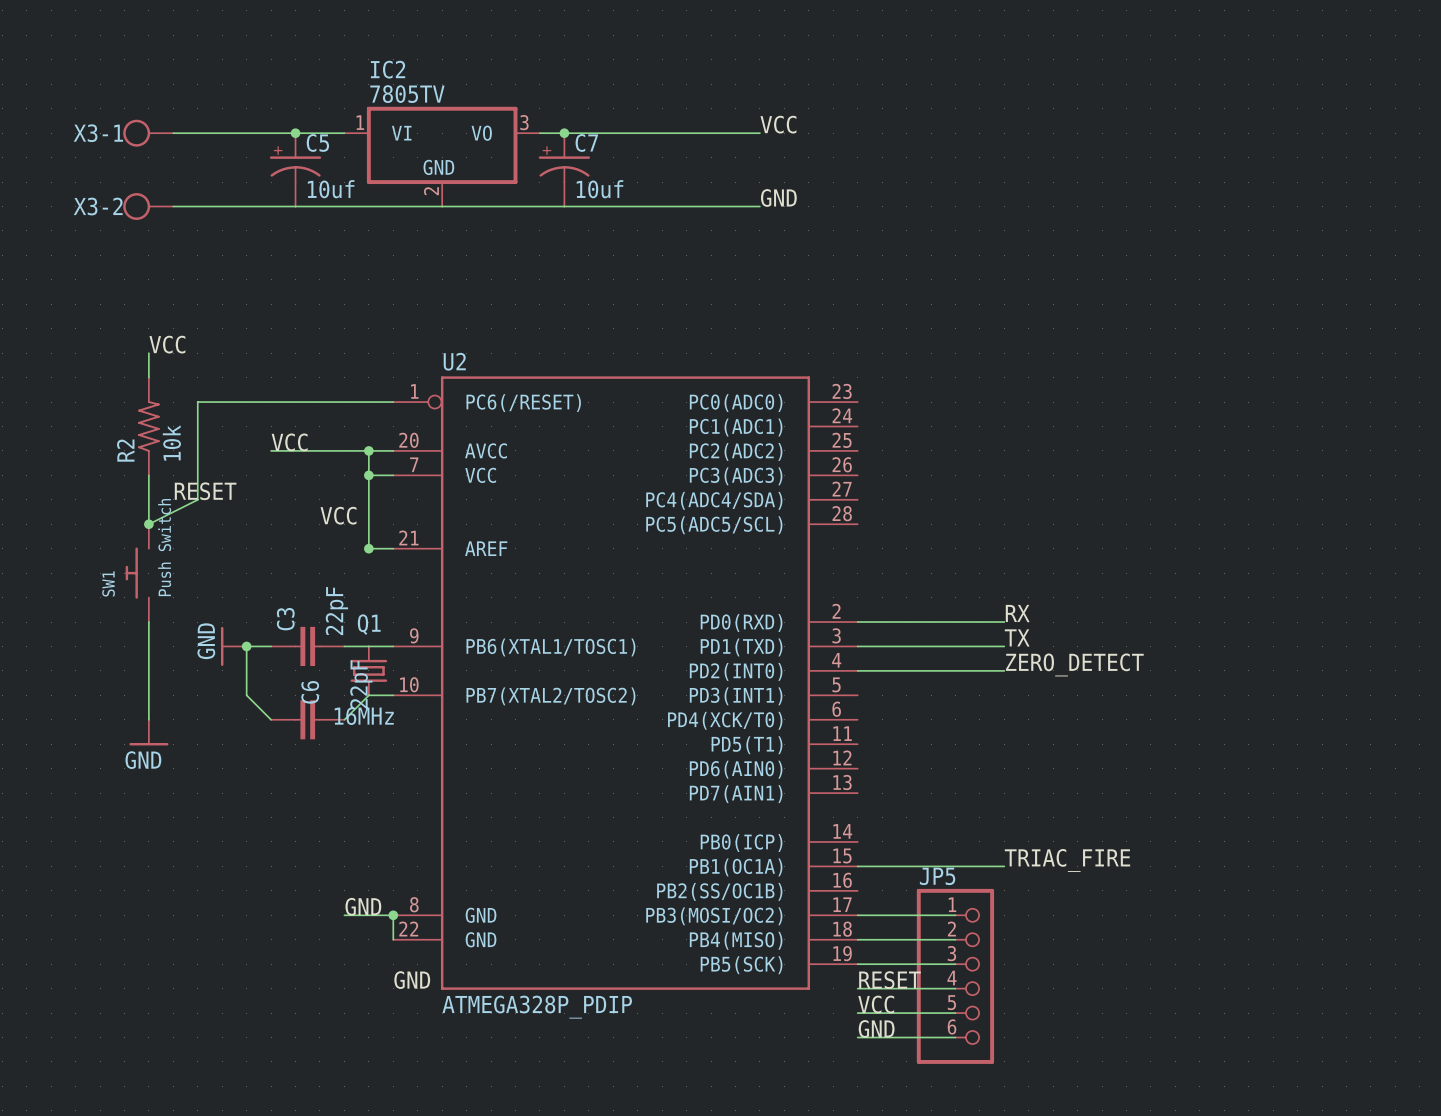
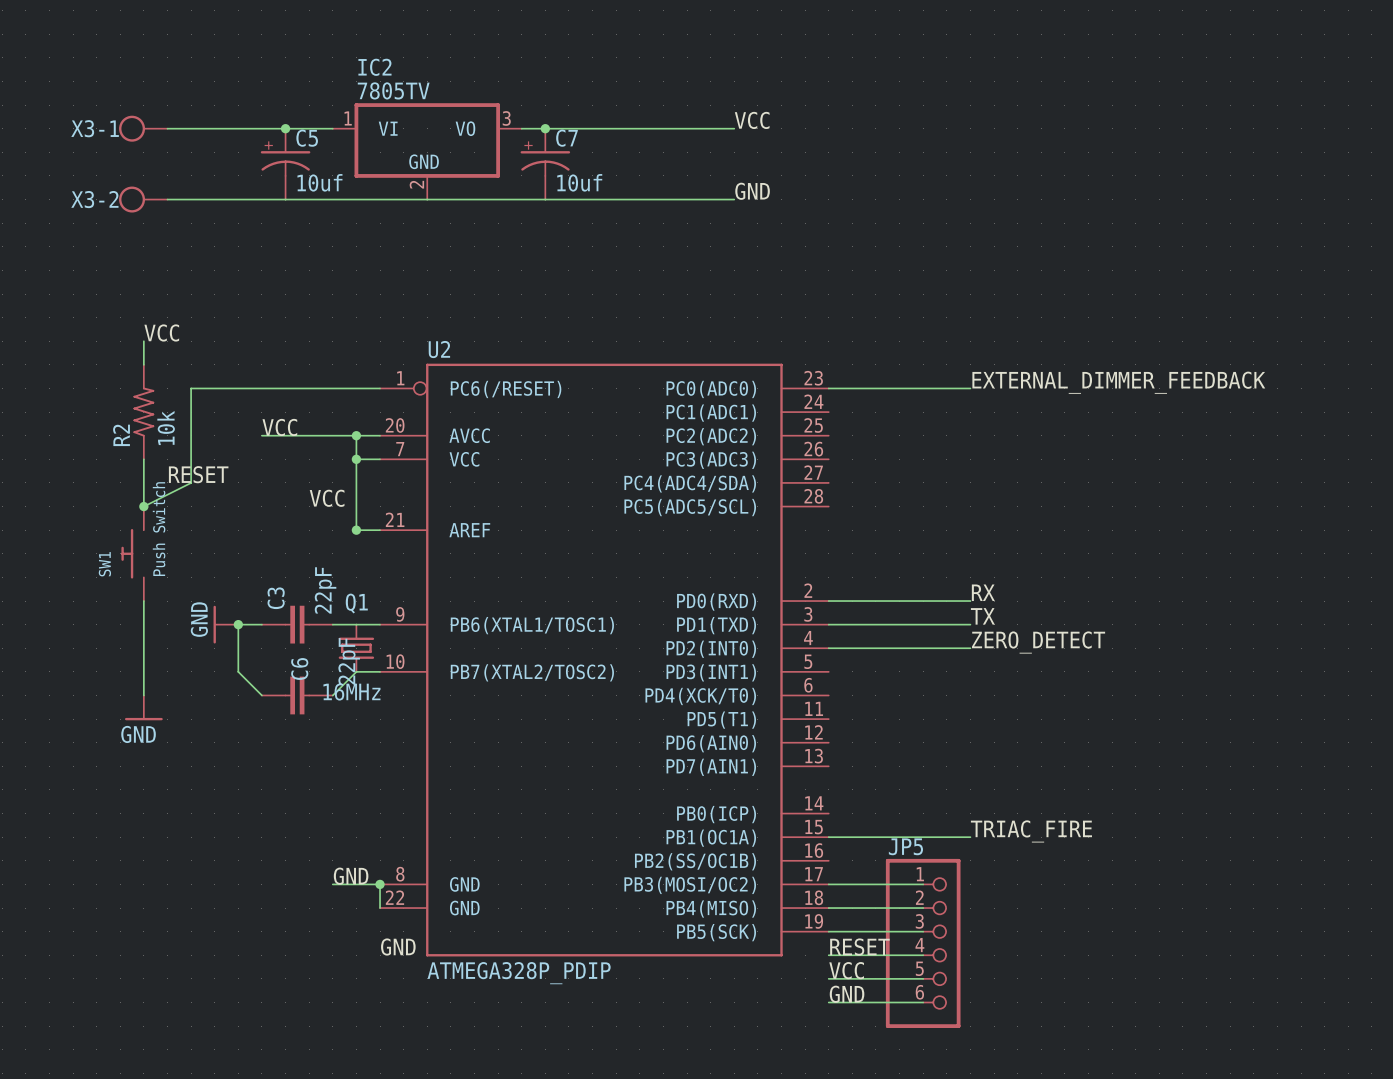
label: none -> EXTERNAL_DIMMER_FEEDBACK (1118, 382)
wire: none -> (828, 388) (970, 388)

